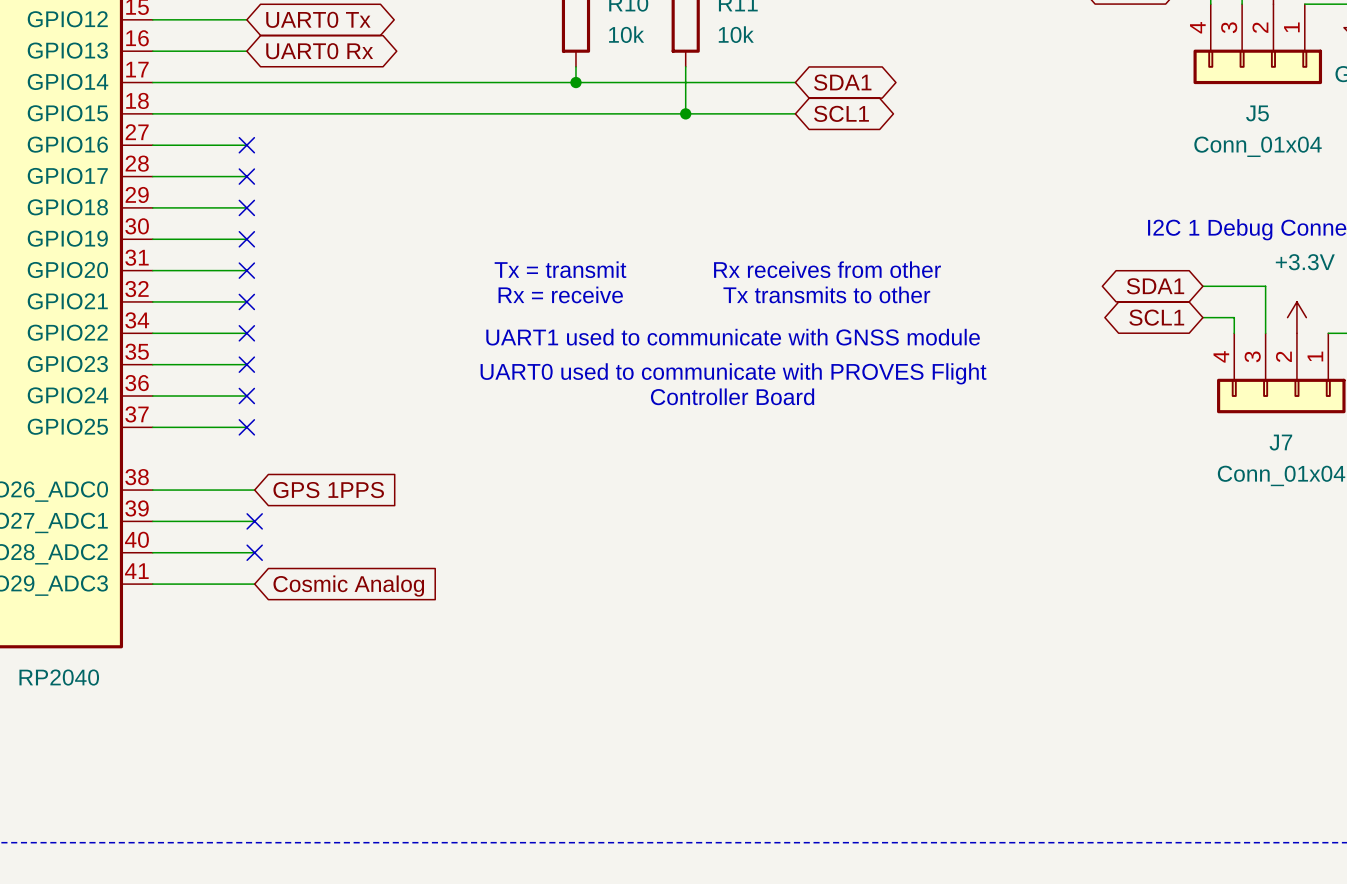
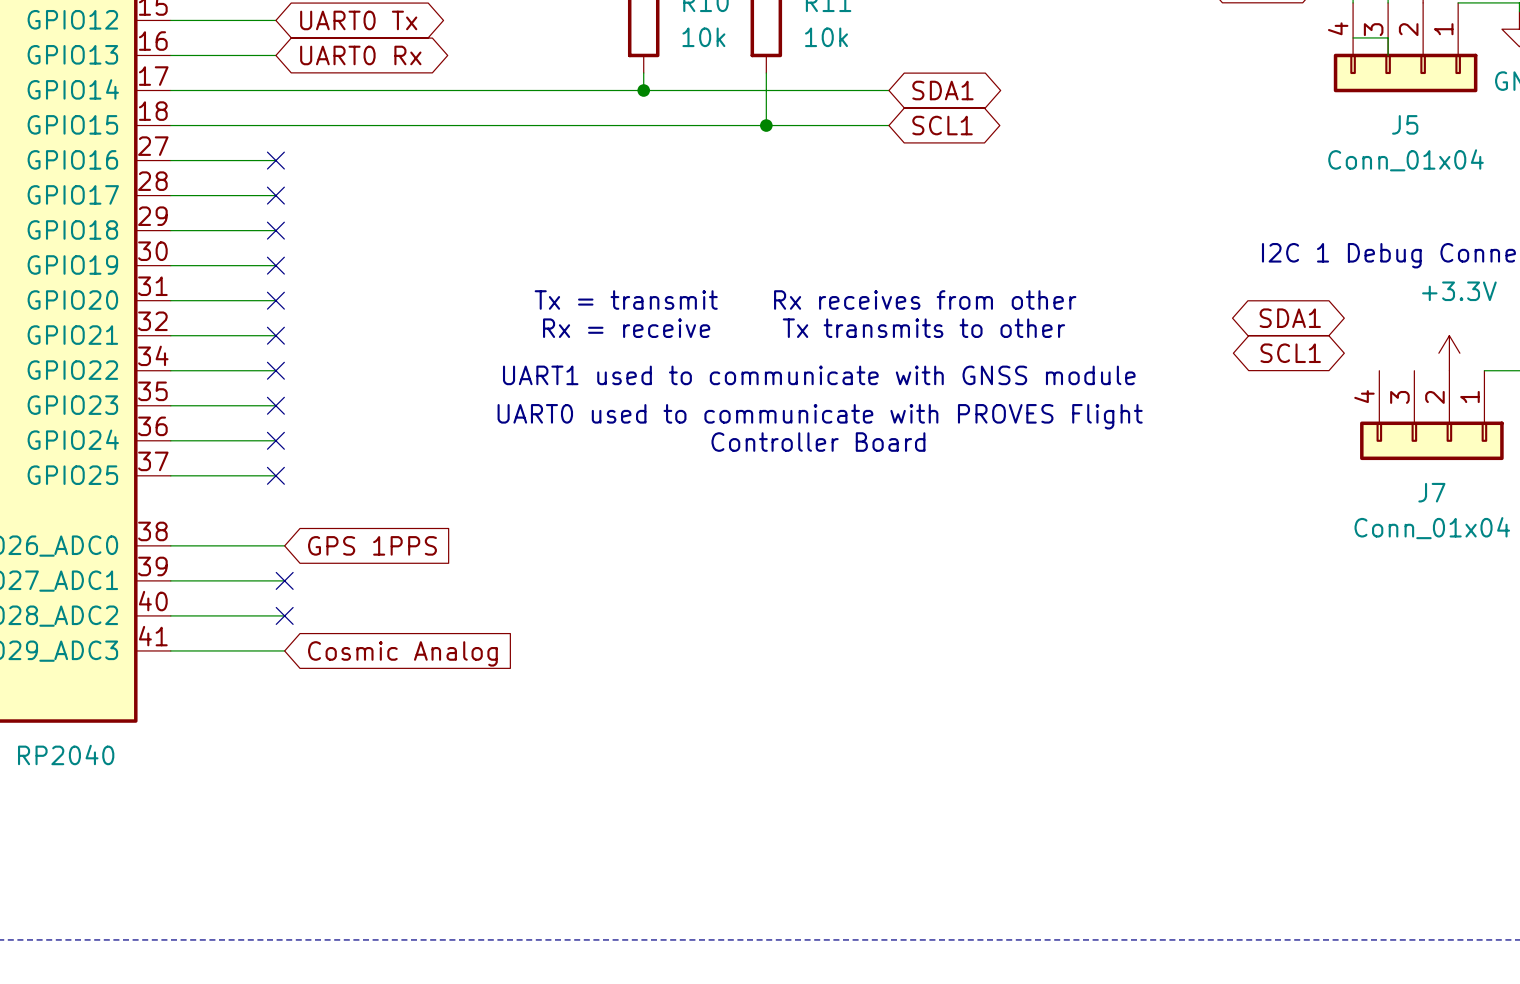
wire: (1202, 286) (1265, 286) (1265, 333) -> none
wire: (1202, 317) (1234, 317) (1234, 333) -> (1353, 37) (1388, 37) (1388, 55)

